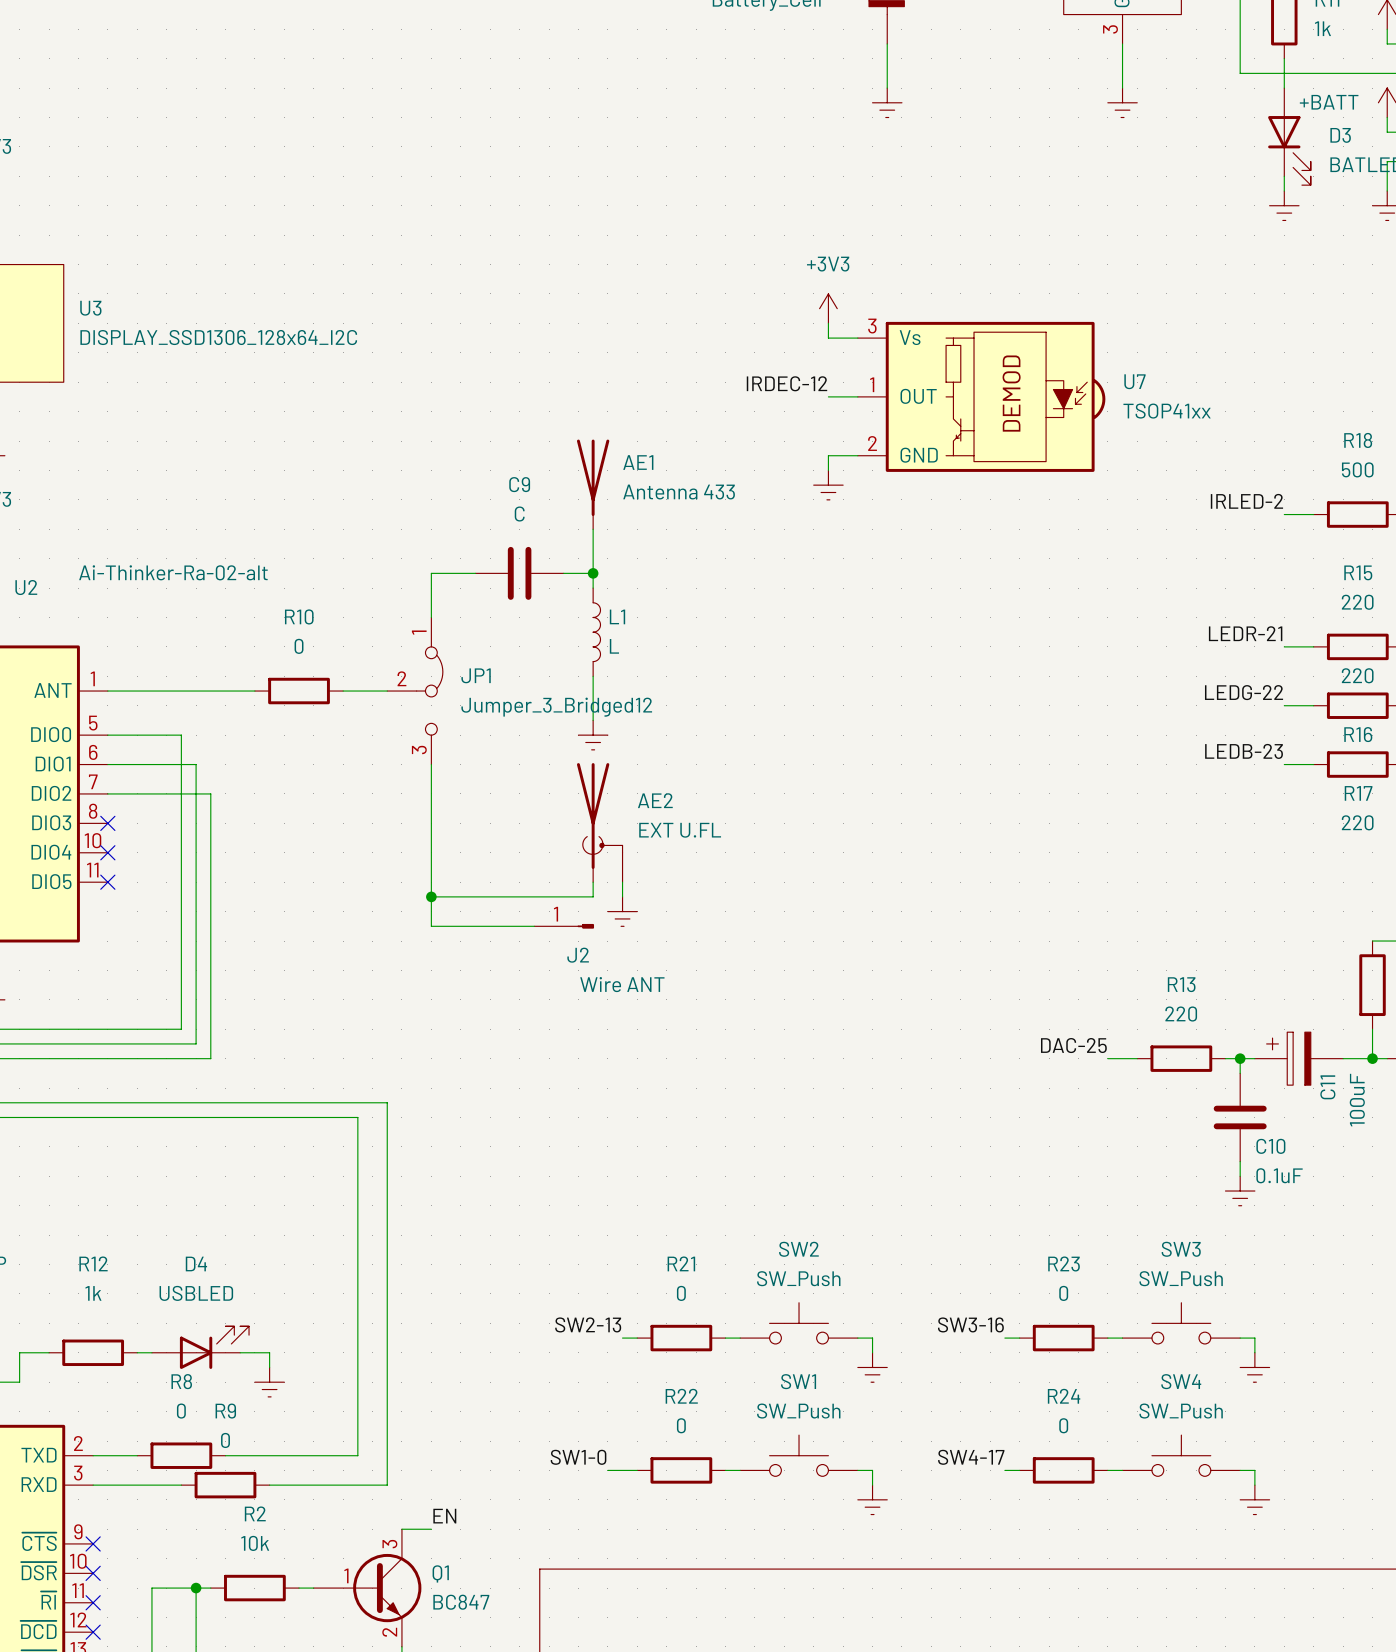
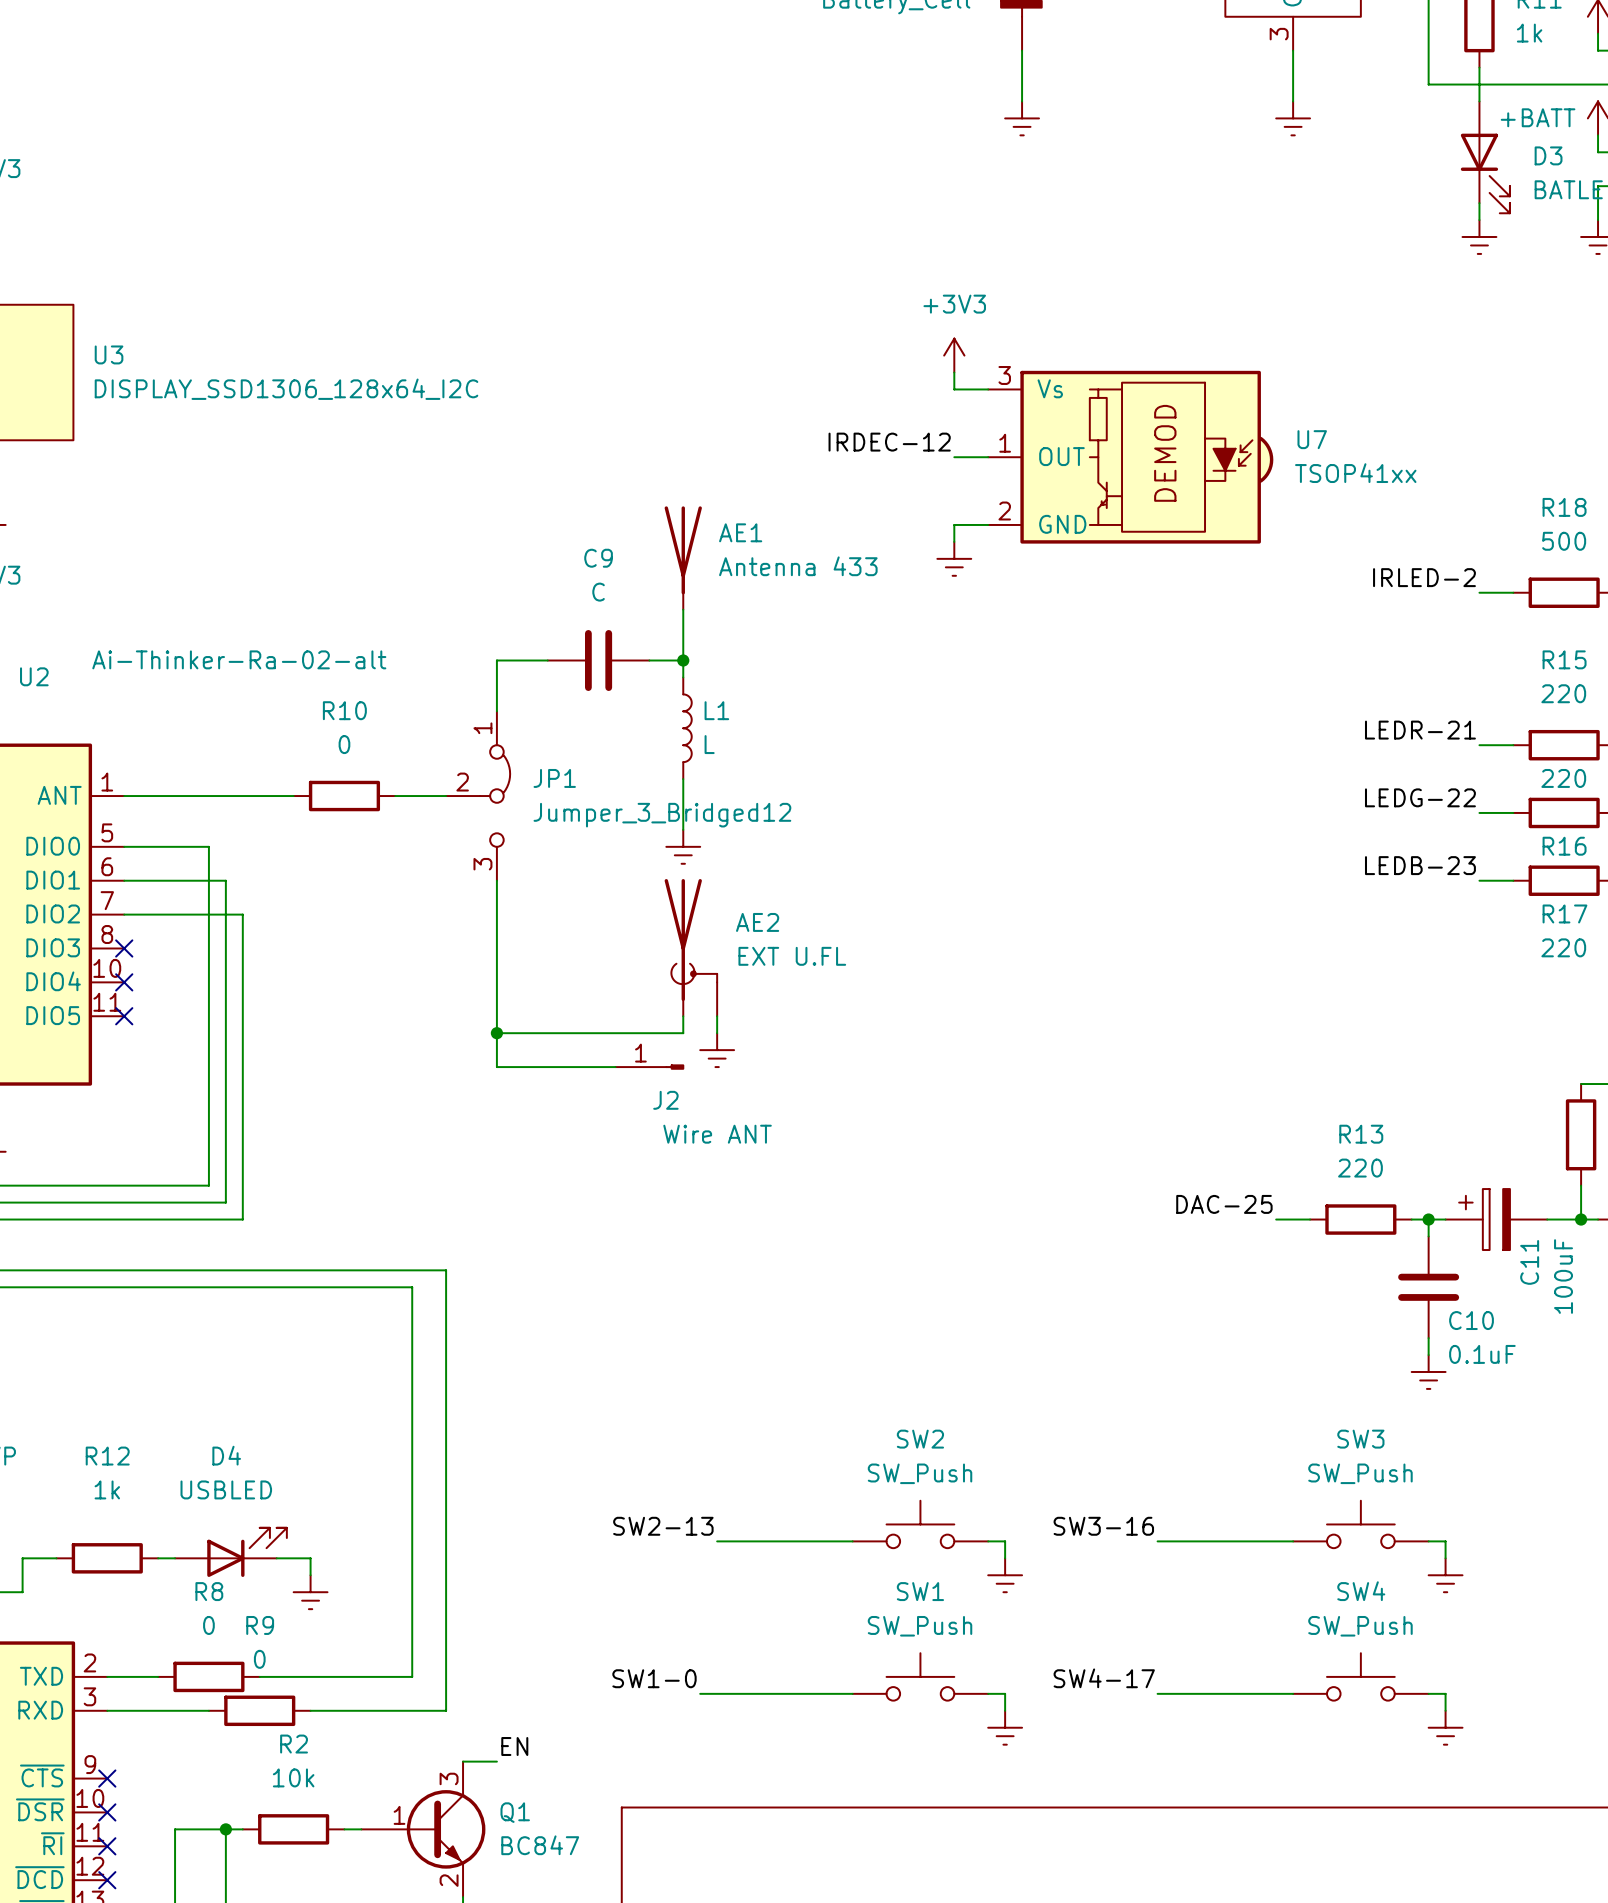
wire: none -> (734, 1541) (835, 1541)
R21: 0 (681, 1338) -> none
wire: none -> (1174, 1541) (1276, 1541)
R23: 0 (1063, 1338) -> none
wire: none -> (734, 1693) (835, 1693)
R22: 0 (681, 1470) -> none
wire: none -> (1174, 1693) (1276, 1693)
R24: 0 (1063, 1470) -> none

